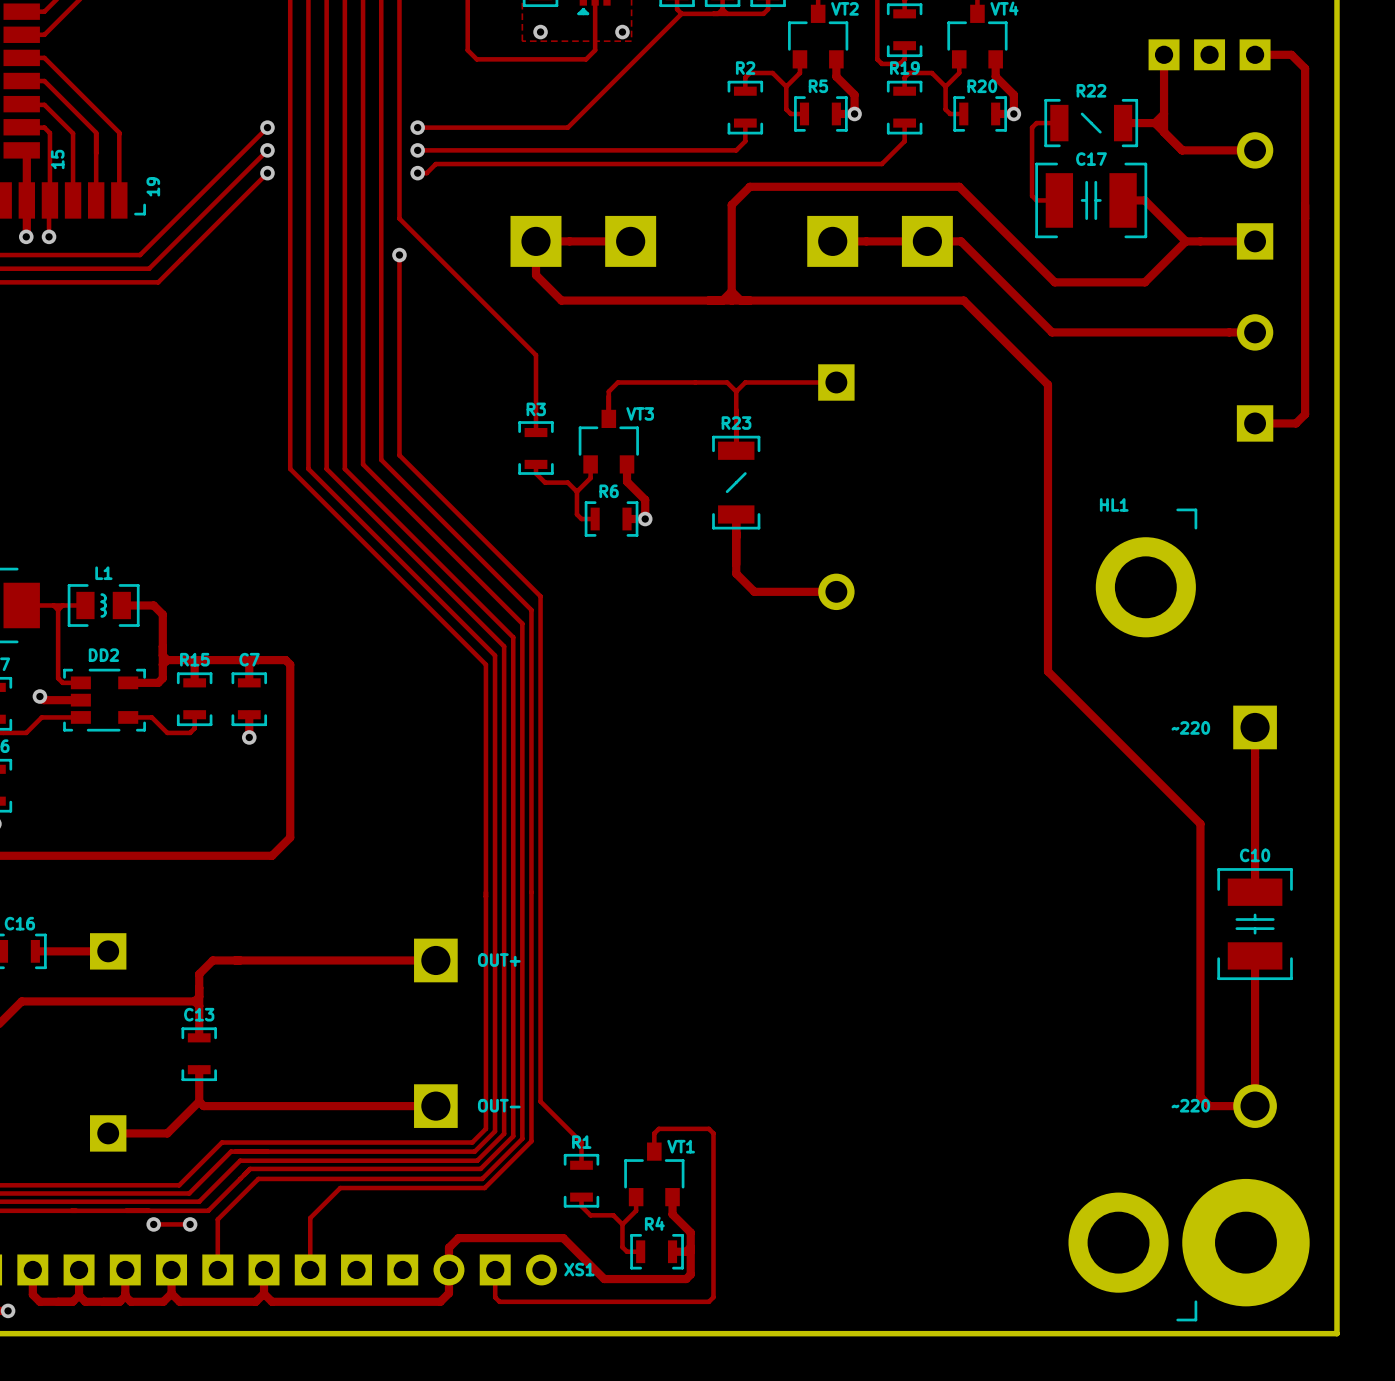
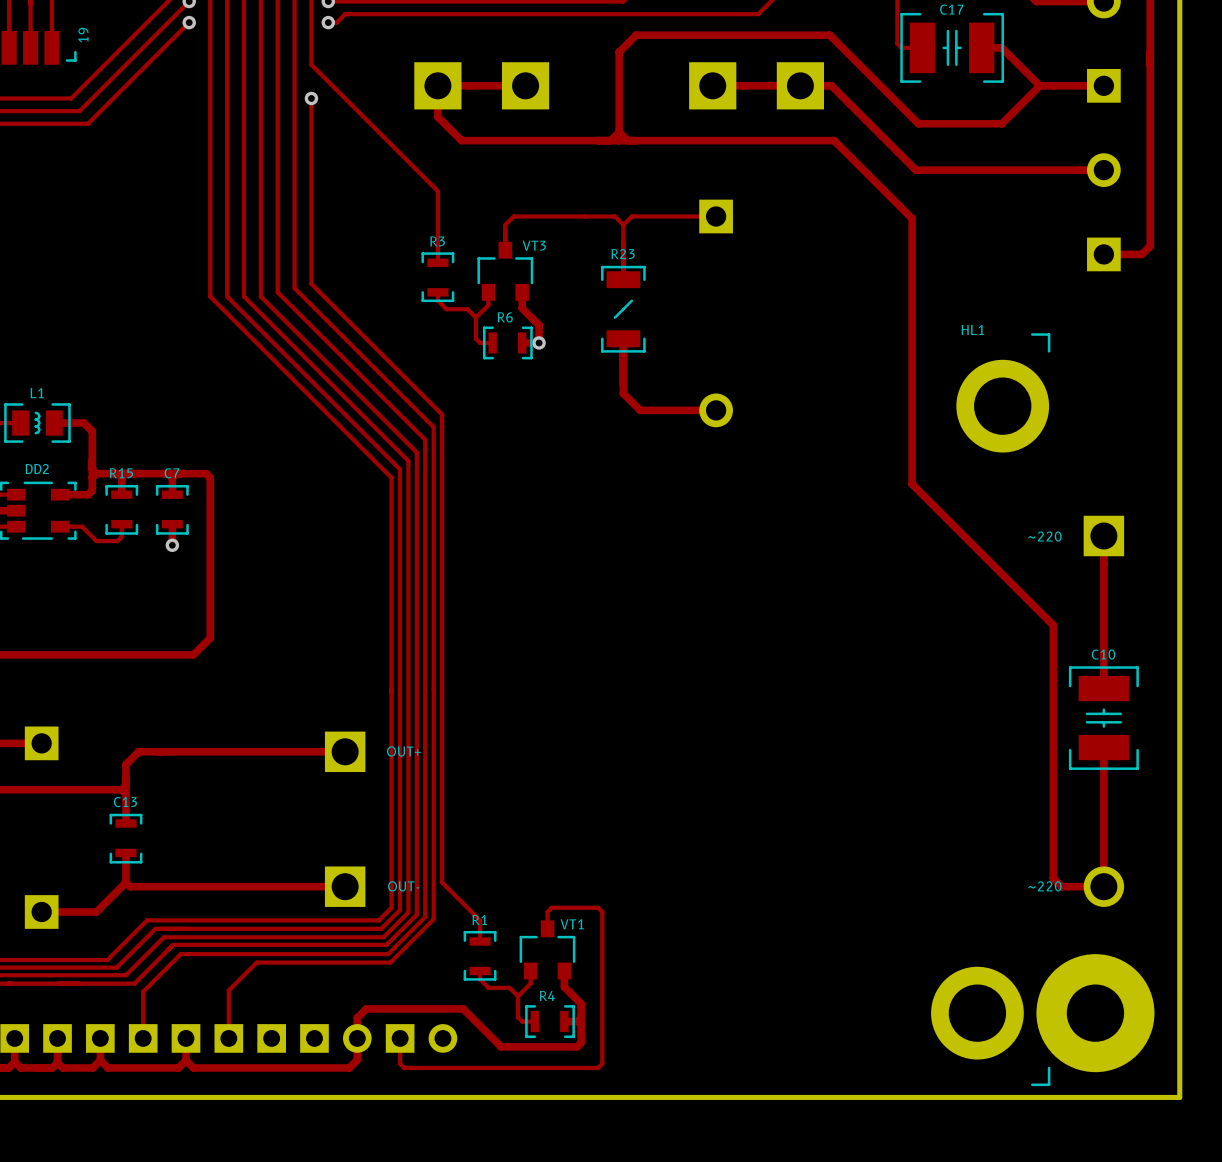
track: (153, 1224) (190, 1224) -> none
via: (153, 1224) -> none
via: (190, 1224) -> none
text: XS1 (579, 1269) -> none

